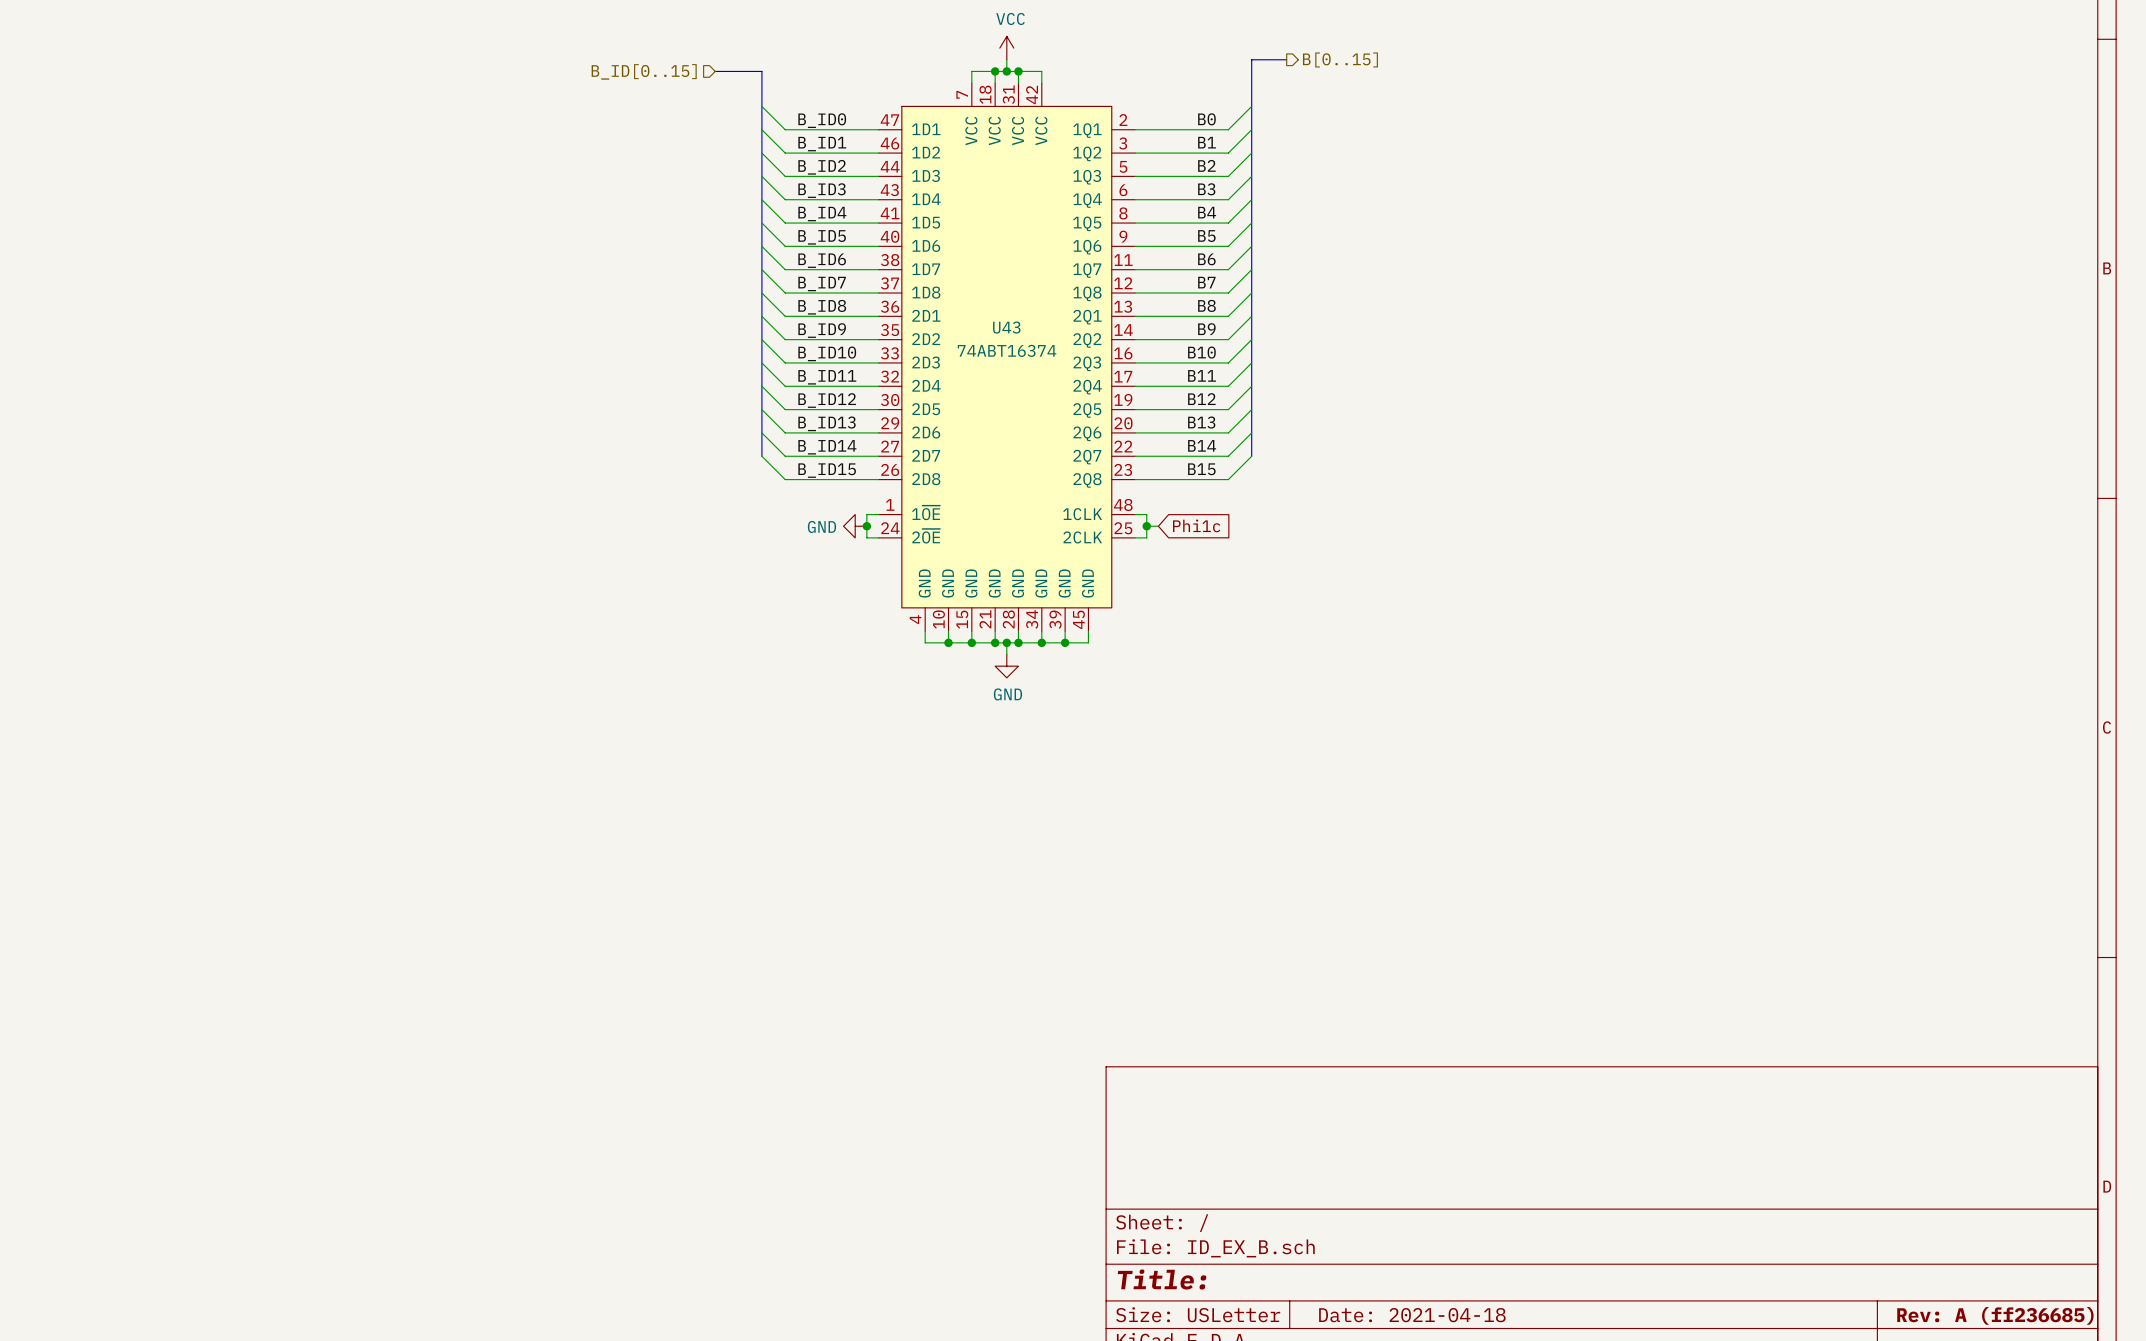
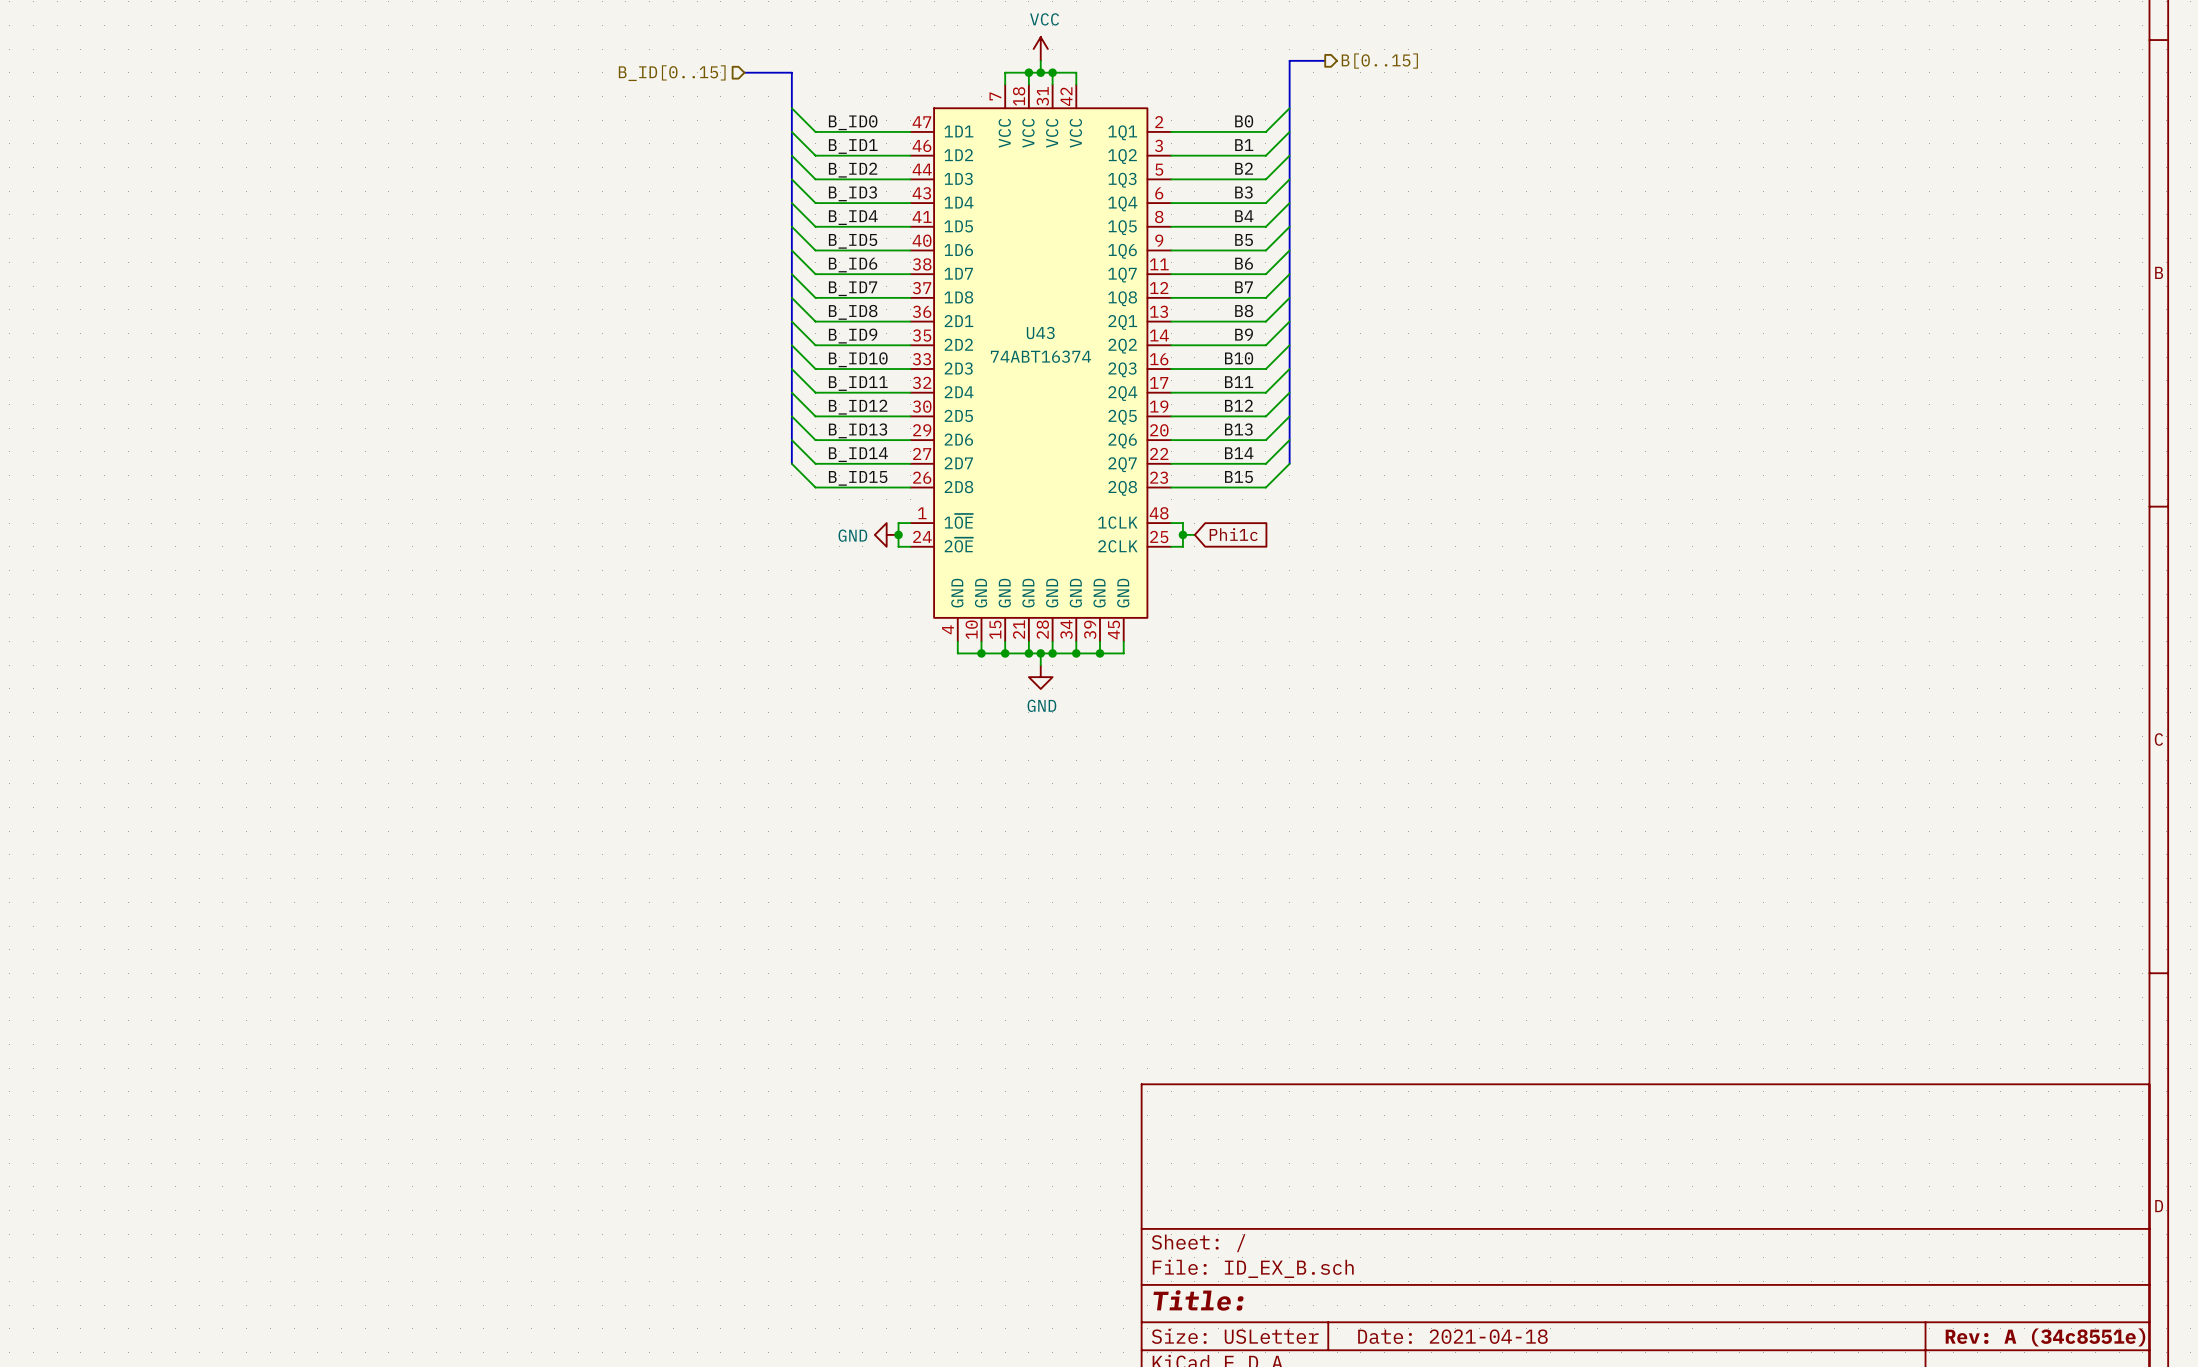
title block: Rev: A (ff236685) (1995, 1315) -> Rev: A (34c8551e) (2045, 1337)

